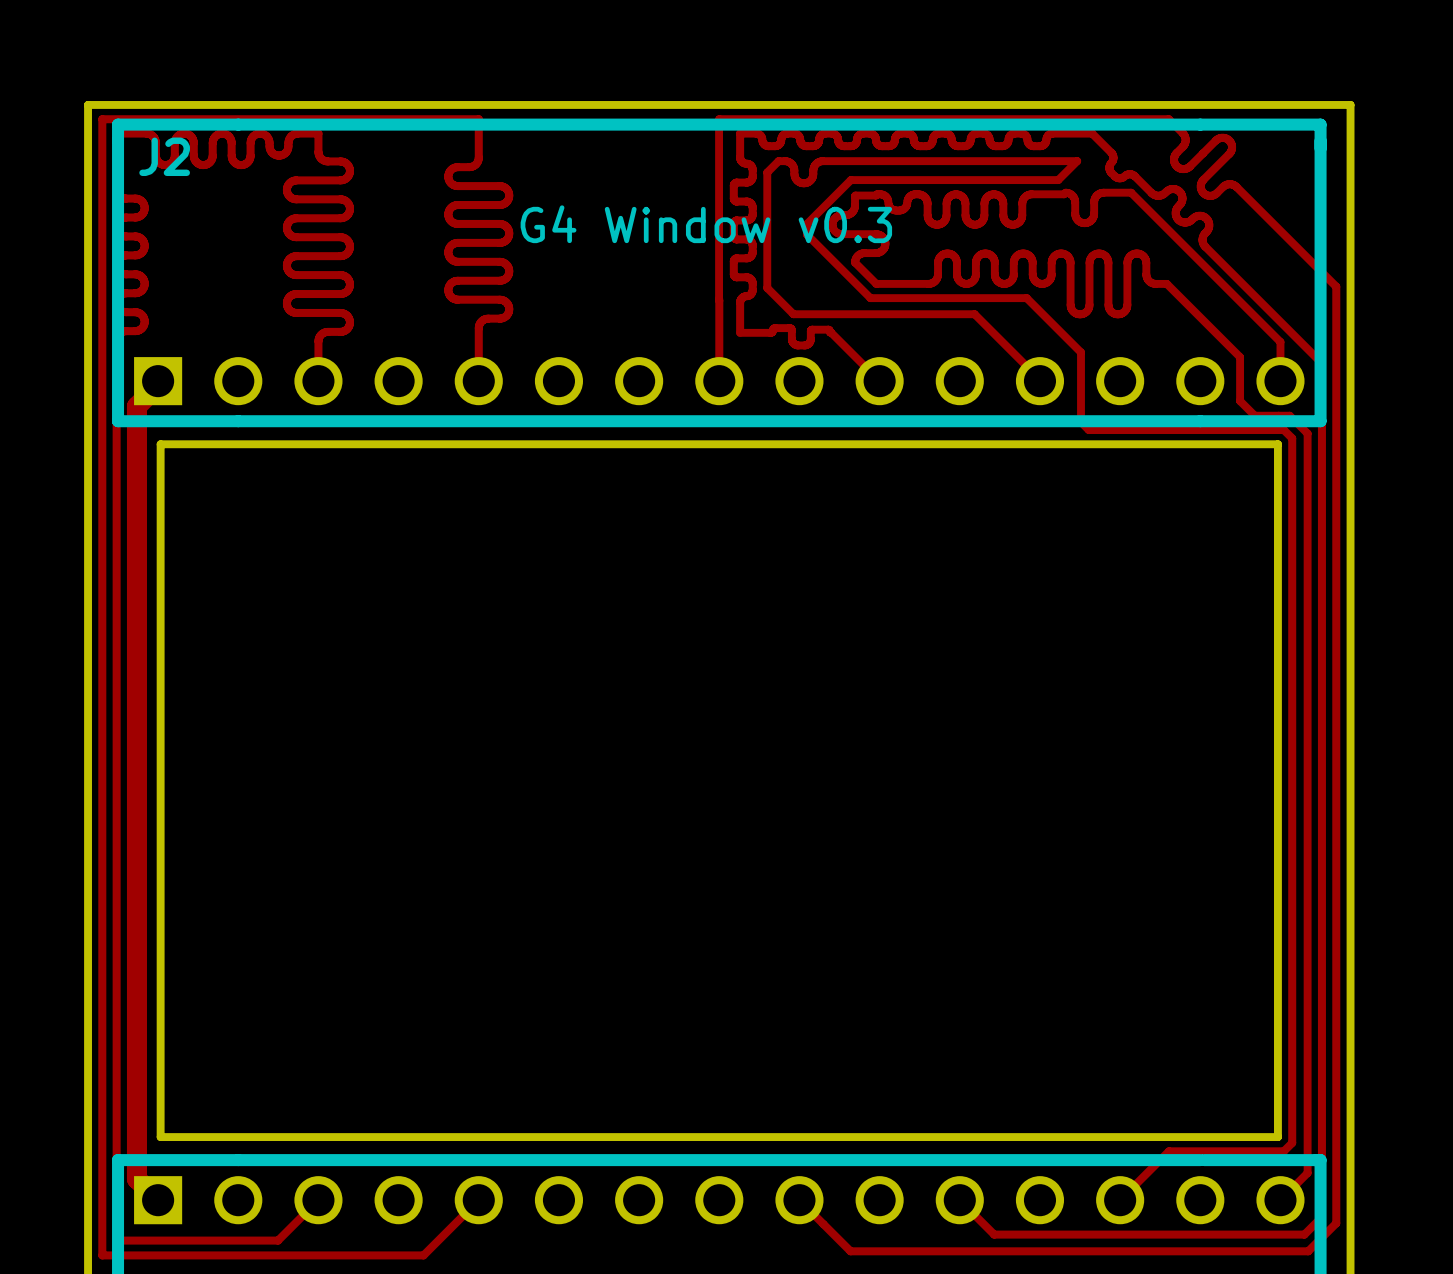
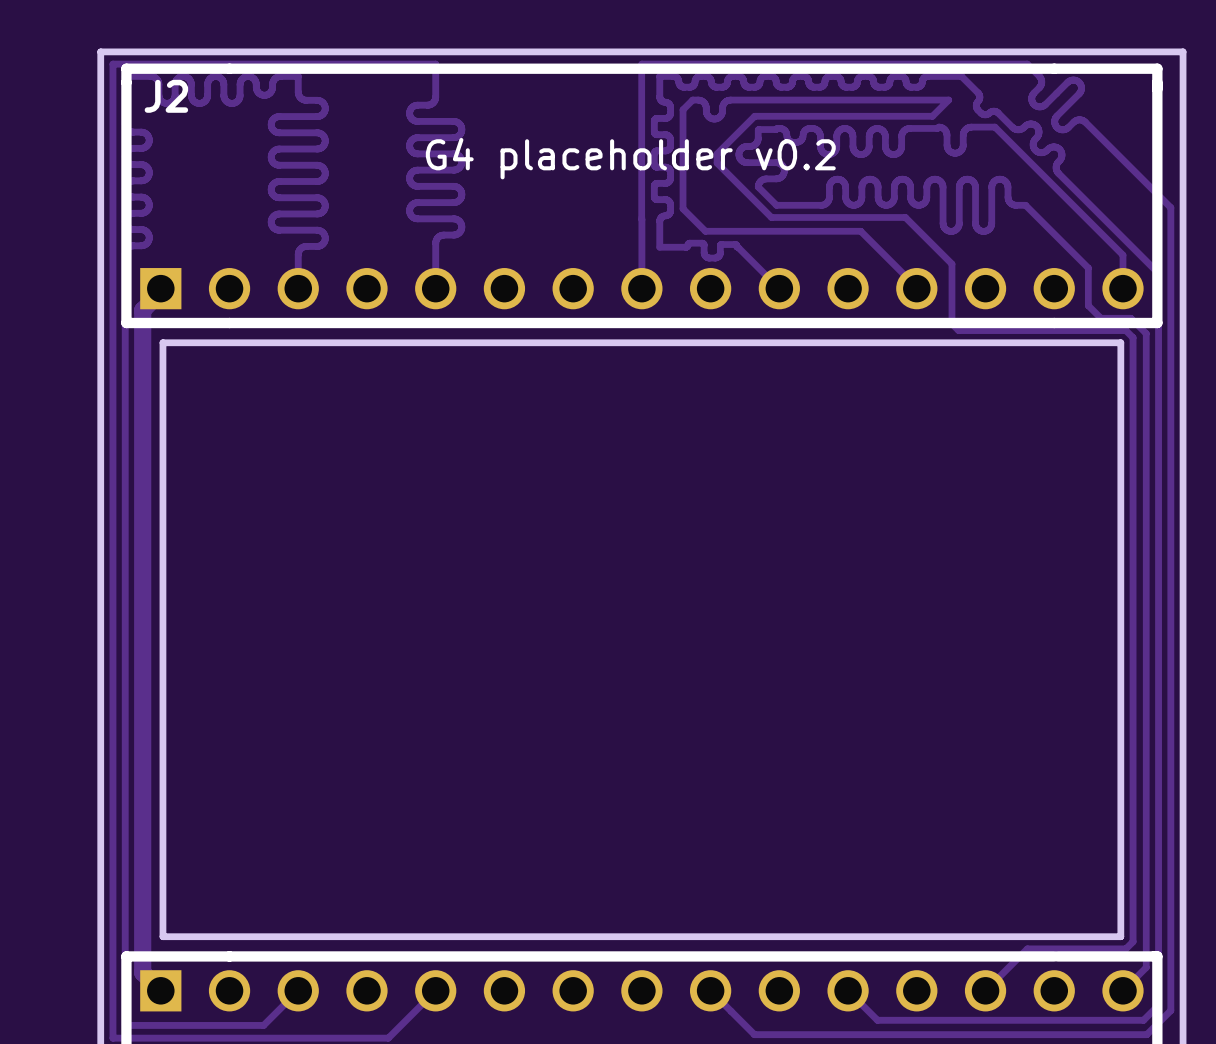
text: G4 Window v0.3 (706, 224) -> G4 placeholder v0.2 (630, 158)

